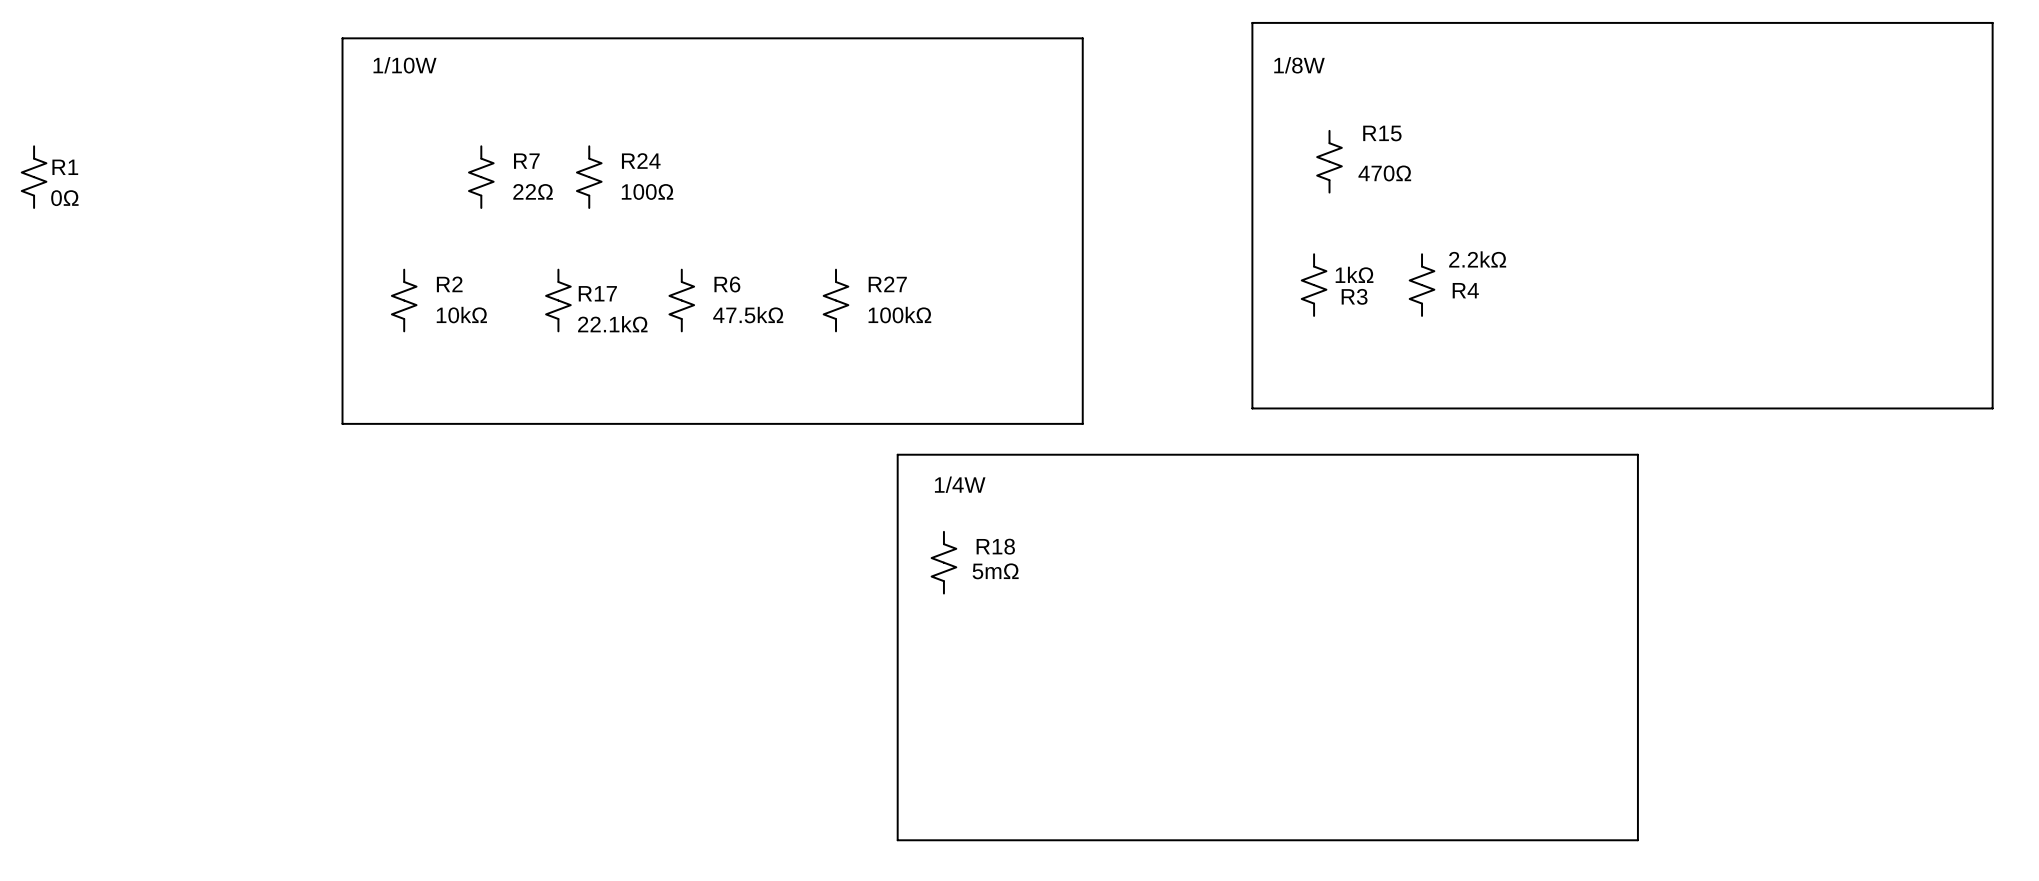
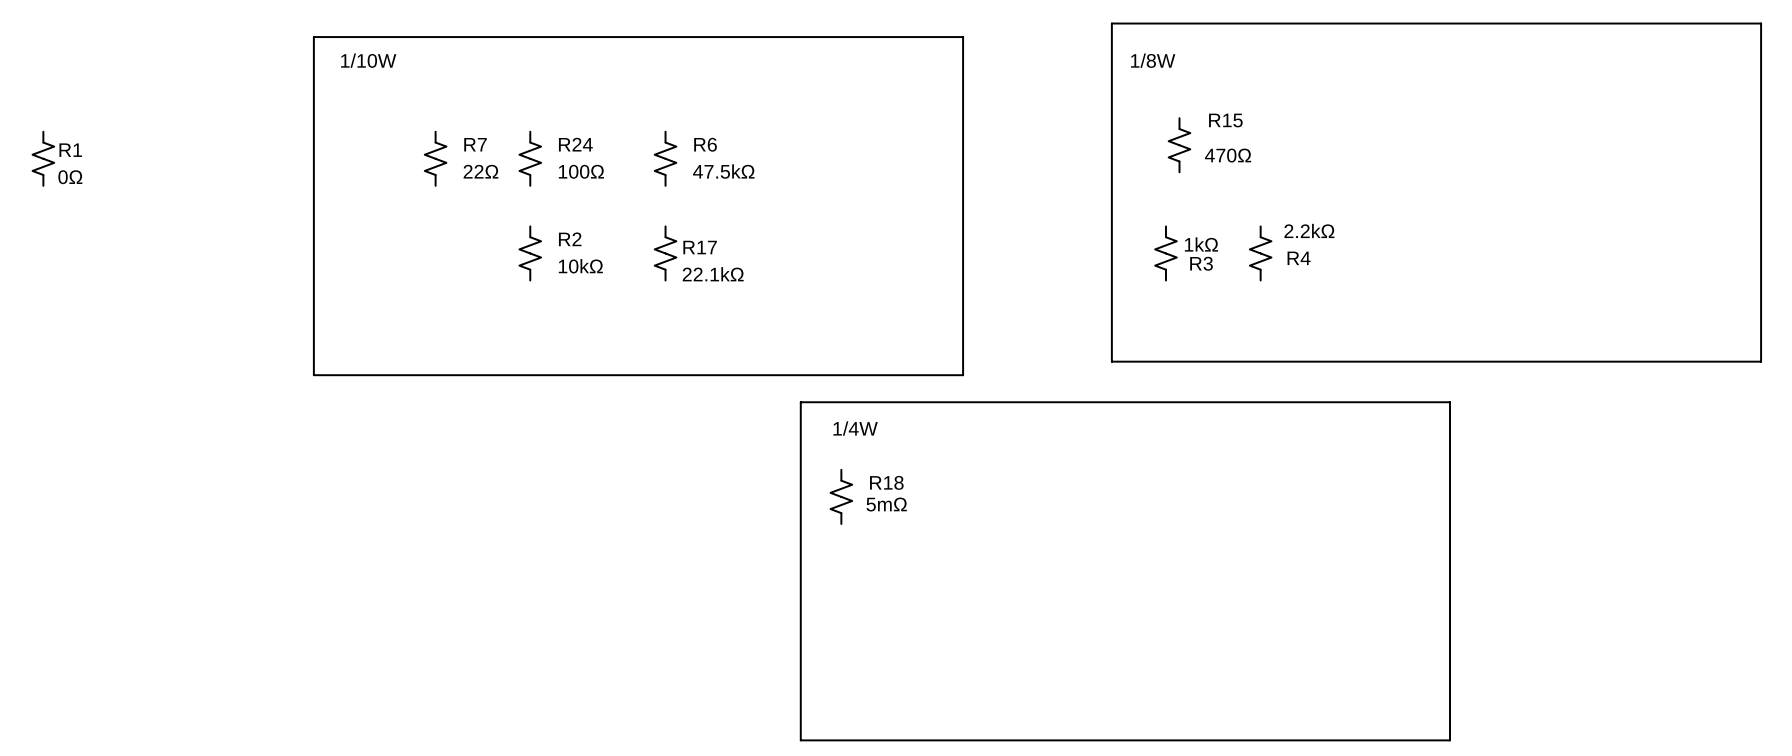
R2 position: (404, 300) -> (530, 253)
R17 position: (558, 300) -> (665, 253)
R6 position: (681, 300) -> (665, 158)
R27: 100kΩ (836, 300) -> none

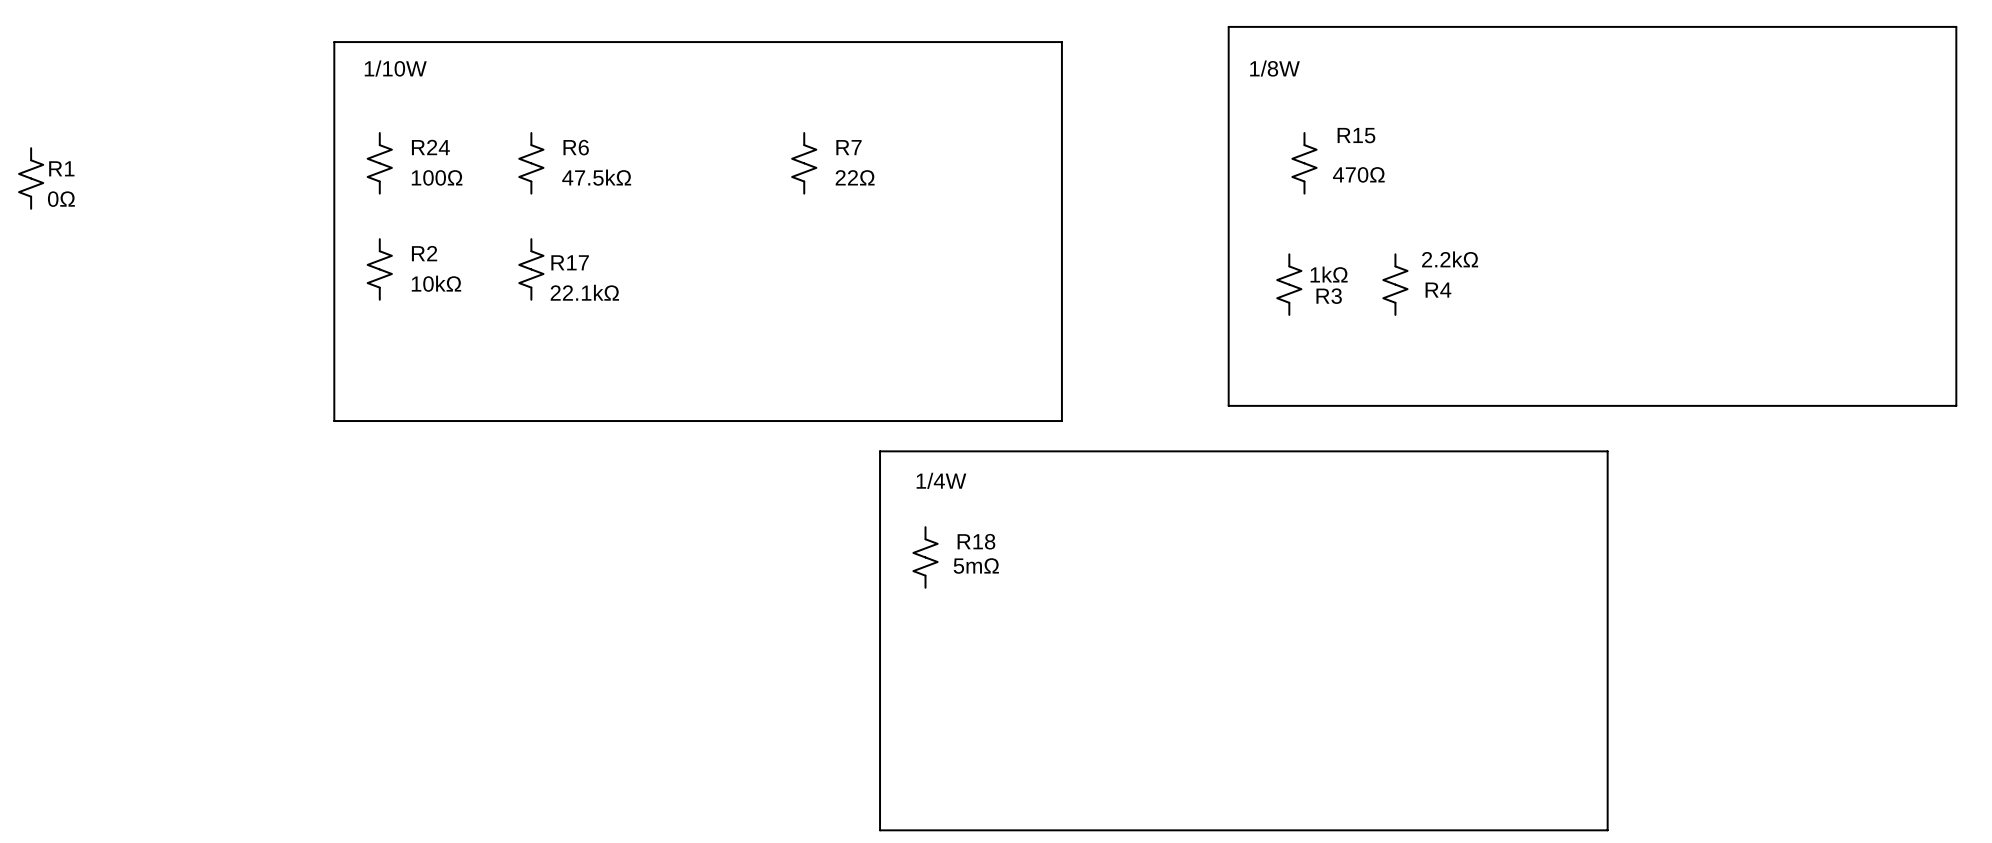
R7 position: (435, 158) -> (804, 163)
R24 position: (530, 158) -> (379, 163)
R6 position: (665, 158) -> (531, 163)
R2 position: (530, 253) -> (379, 269)
R17 position: (665, 253) -> (531, 269)

